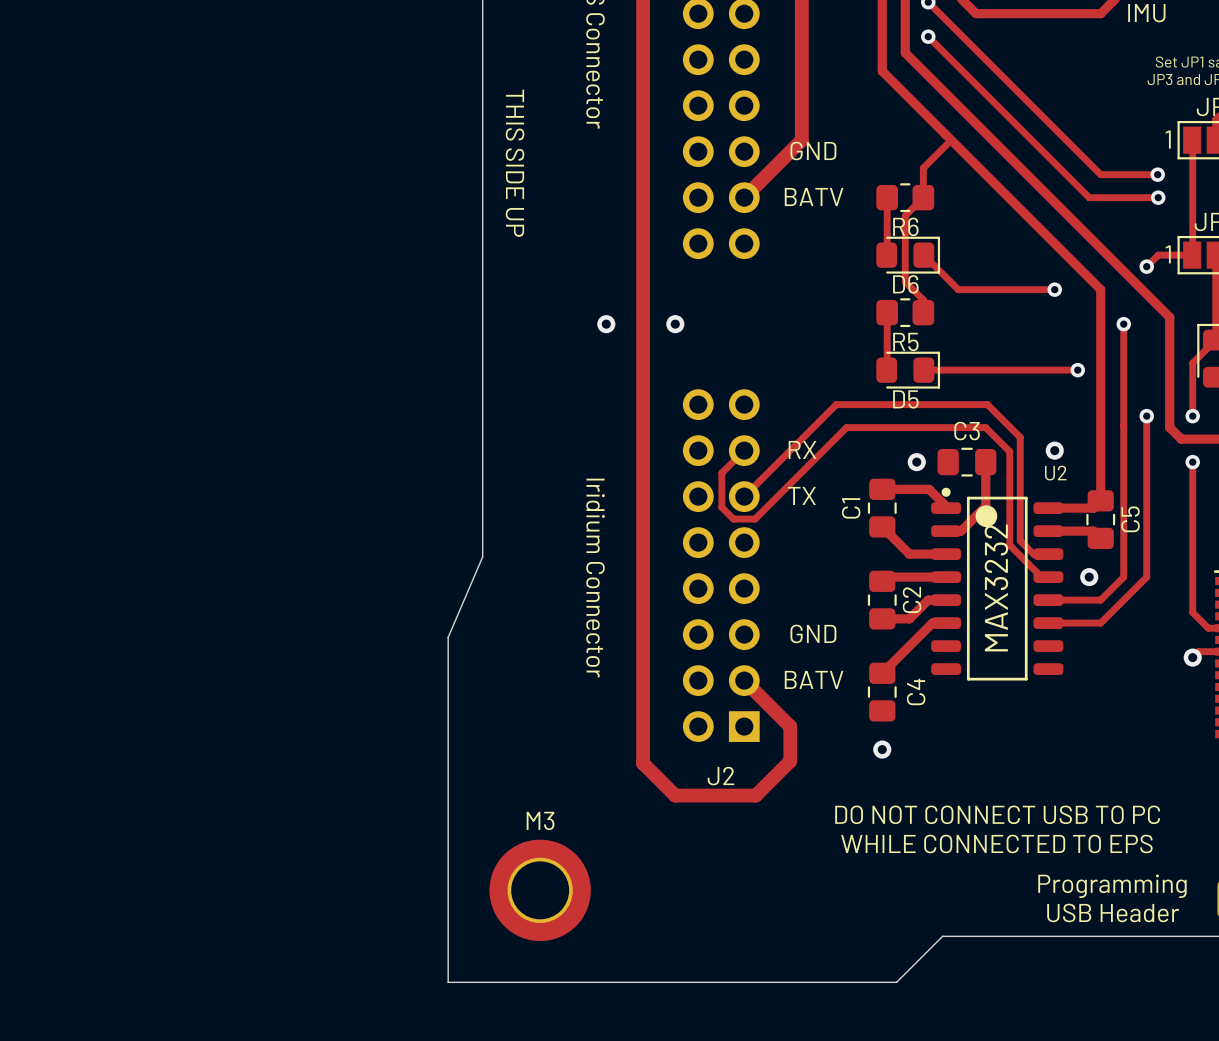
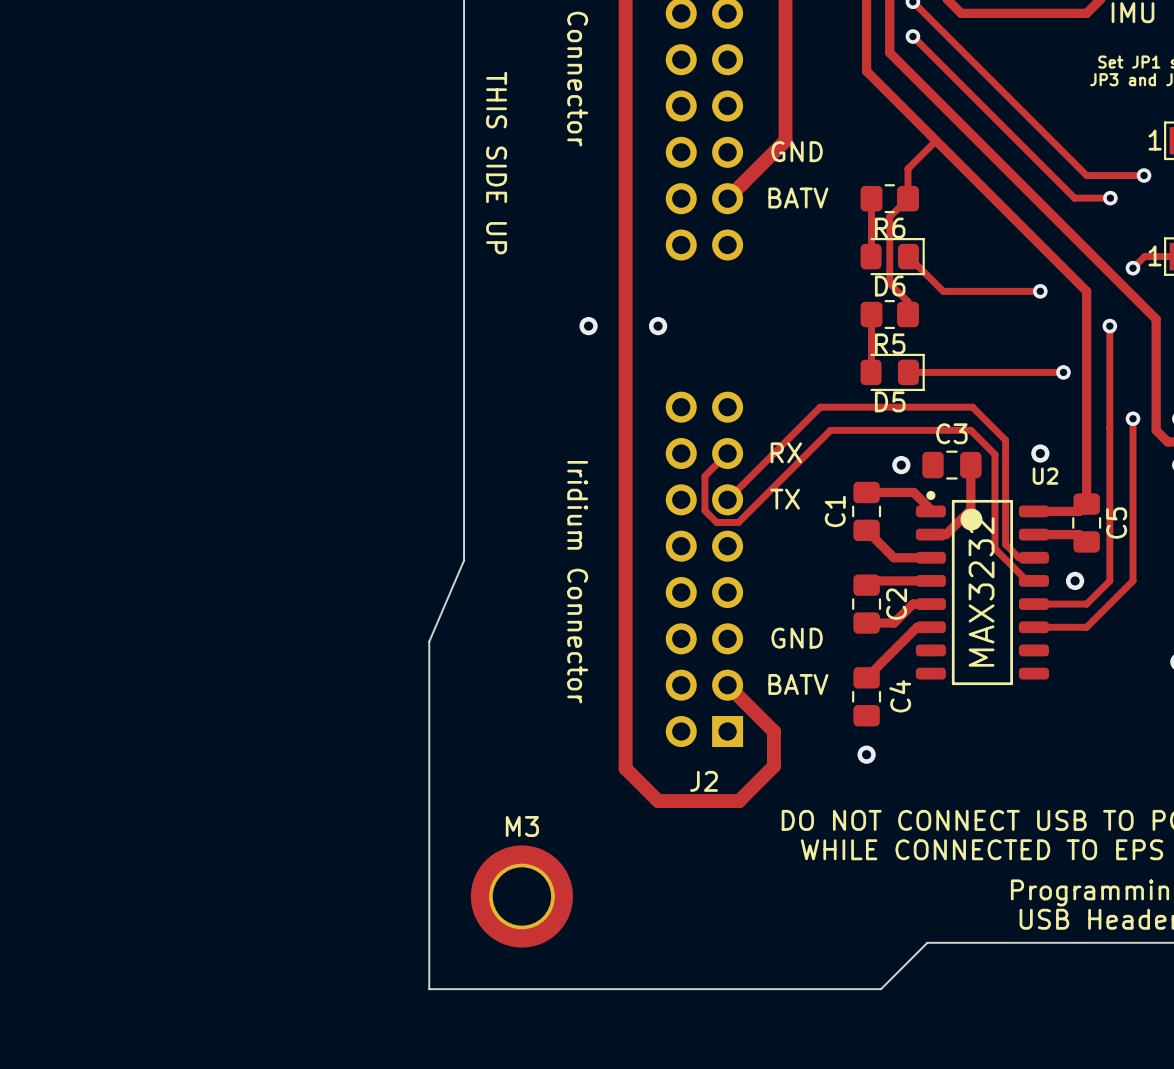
track: (1088, 197) (1158, 197) -> (1074, 198) (1110, 198)
via position: (1158, 197) -> (1110, 198)

